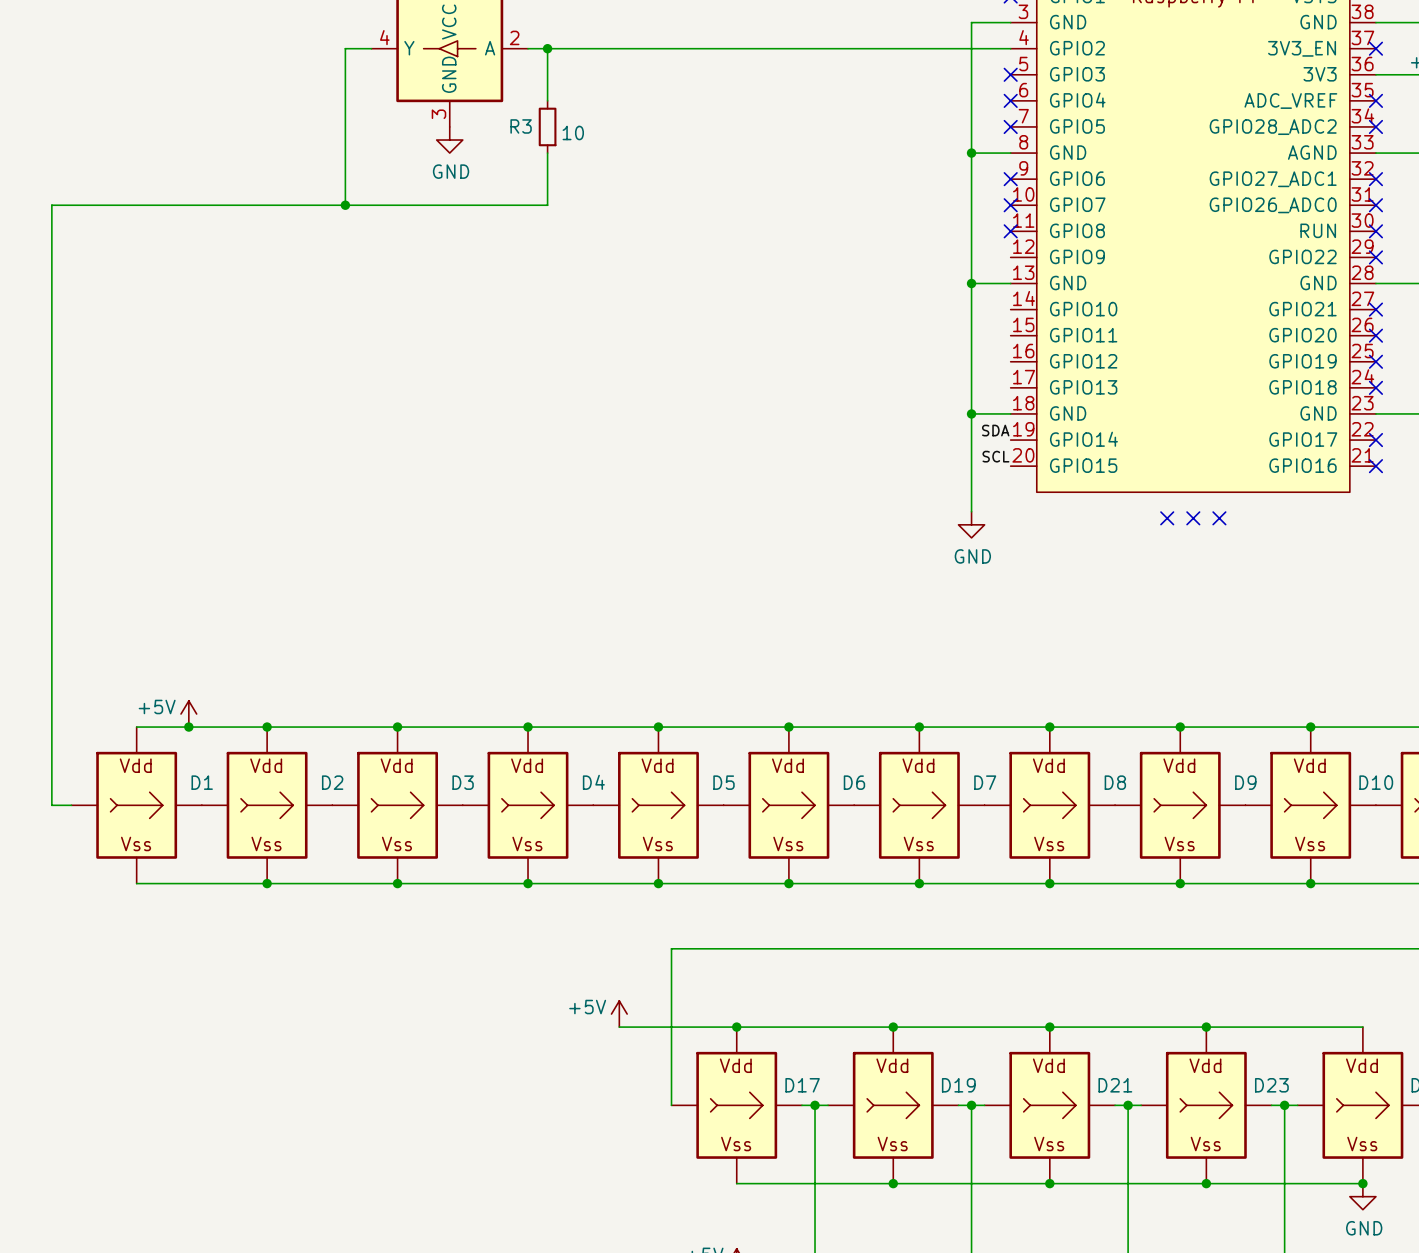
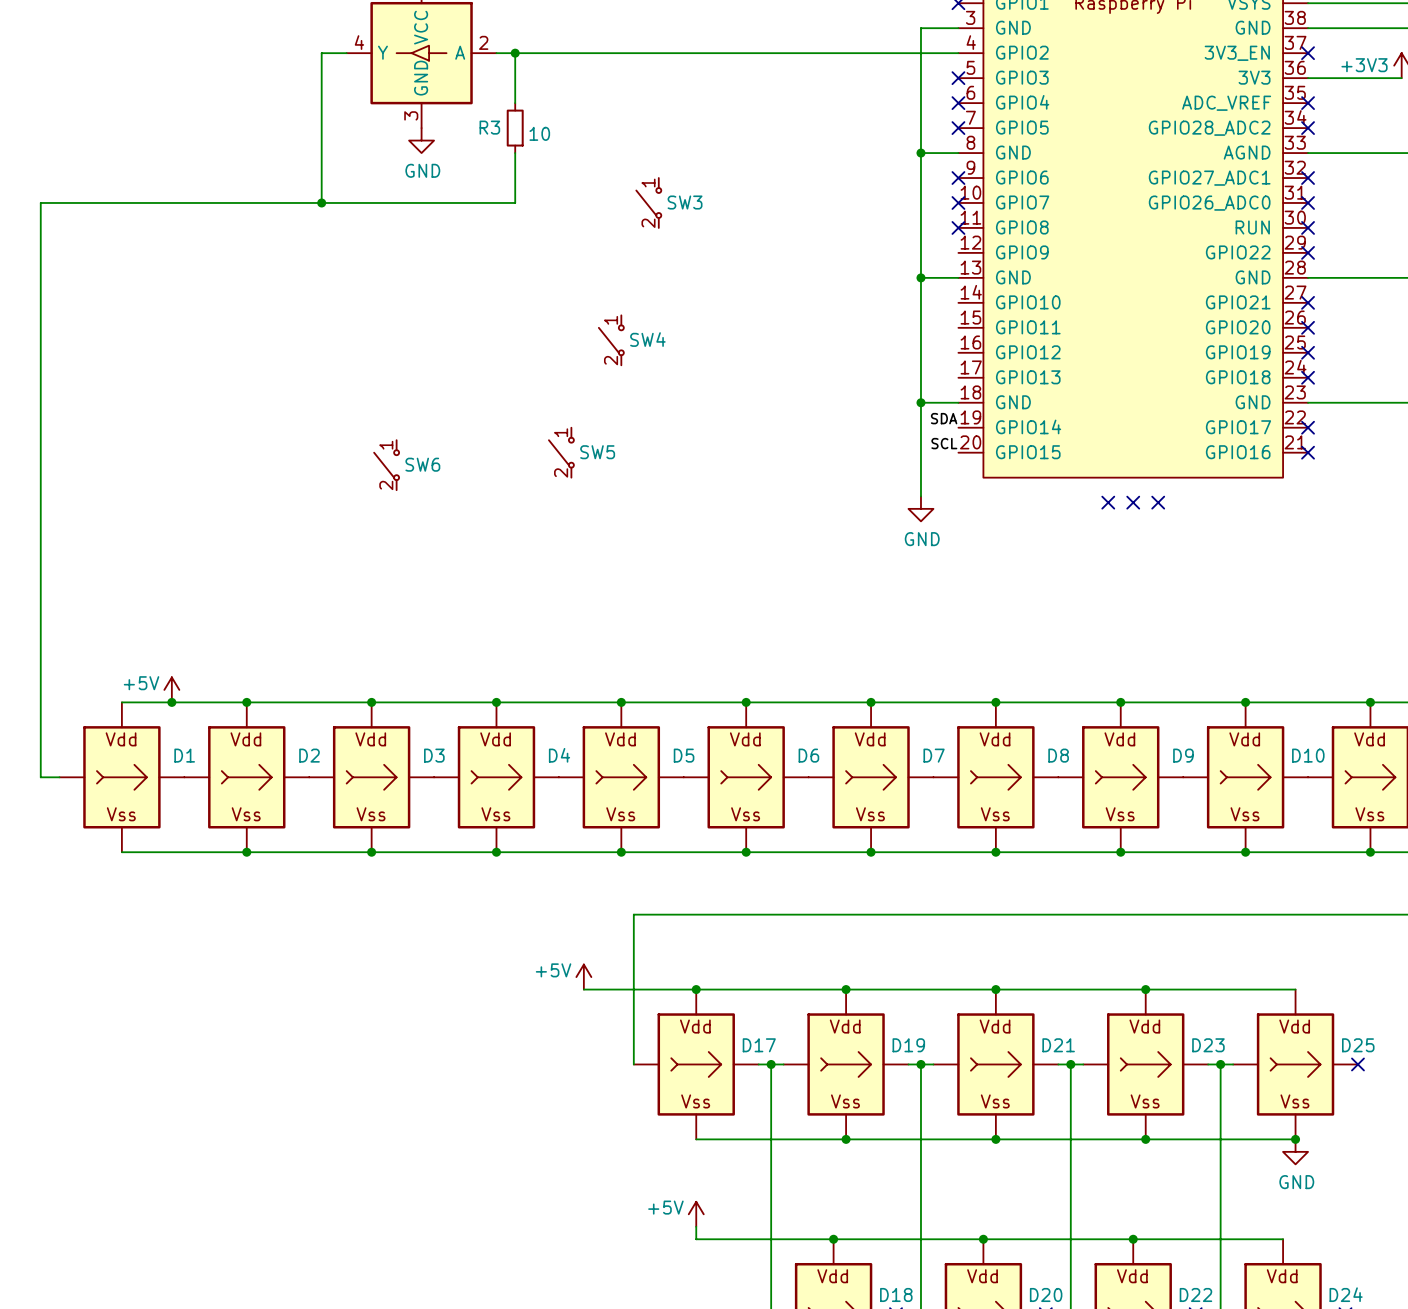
SW3: none -> (648, 202)
SW4: none -> (611, 340)
SW5: none -> (561, 452)
SW6: none -> (386, 465)

